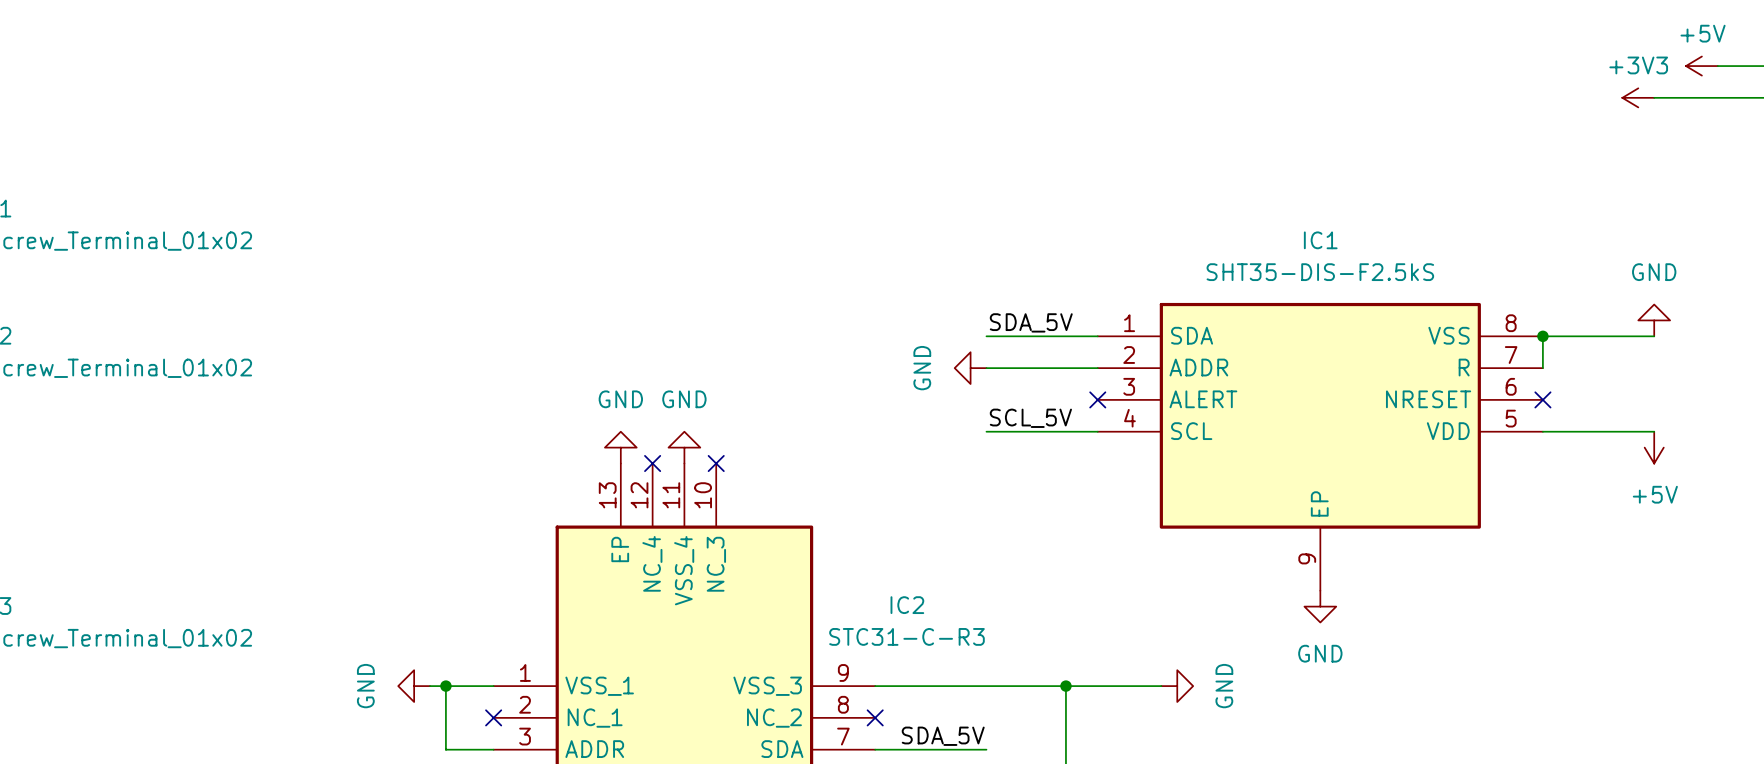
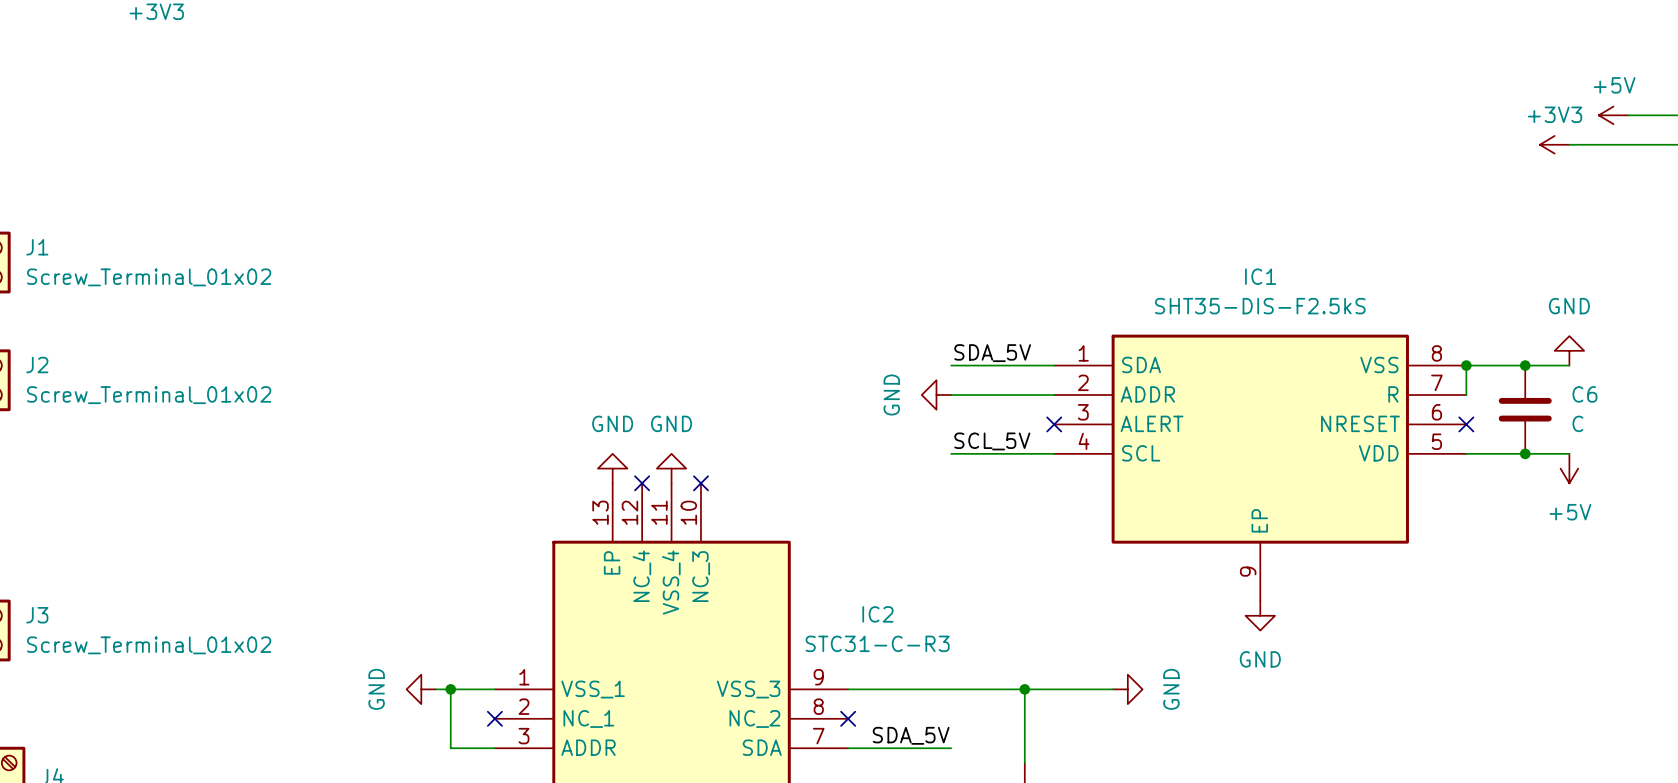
junction: none -> (1525, 365)
C6: none -> C (1525, 409)
junction: none -> (1525, 453)

